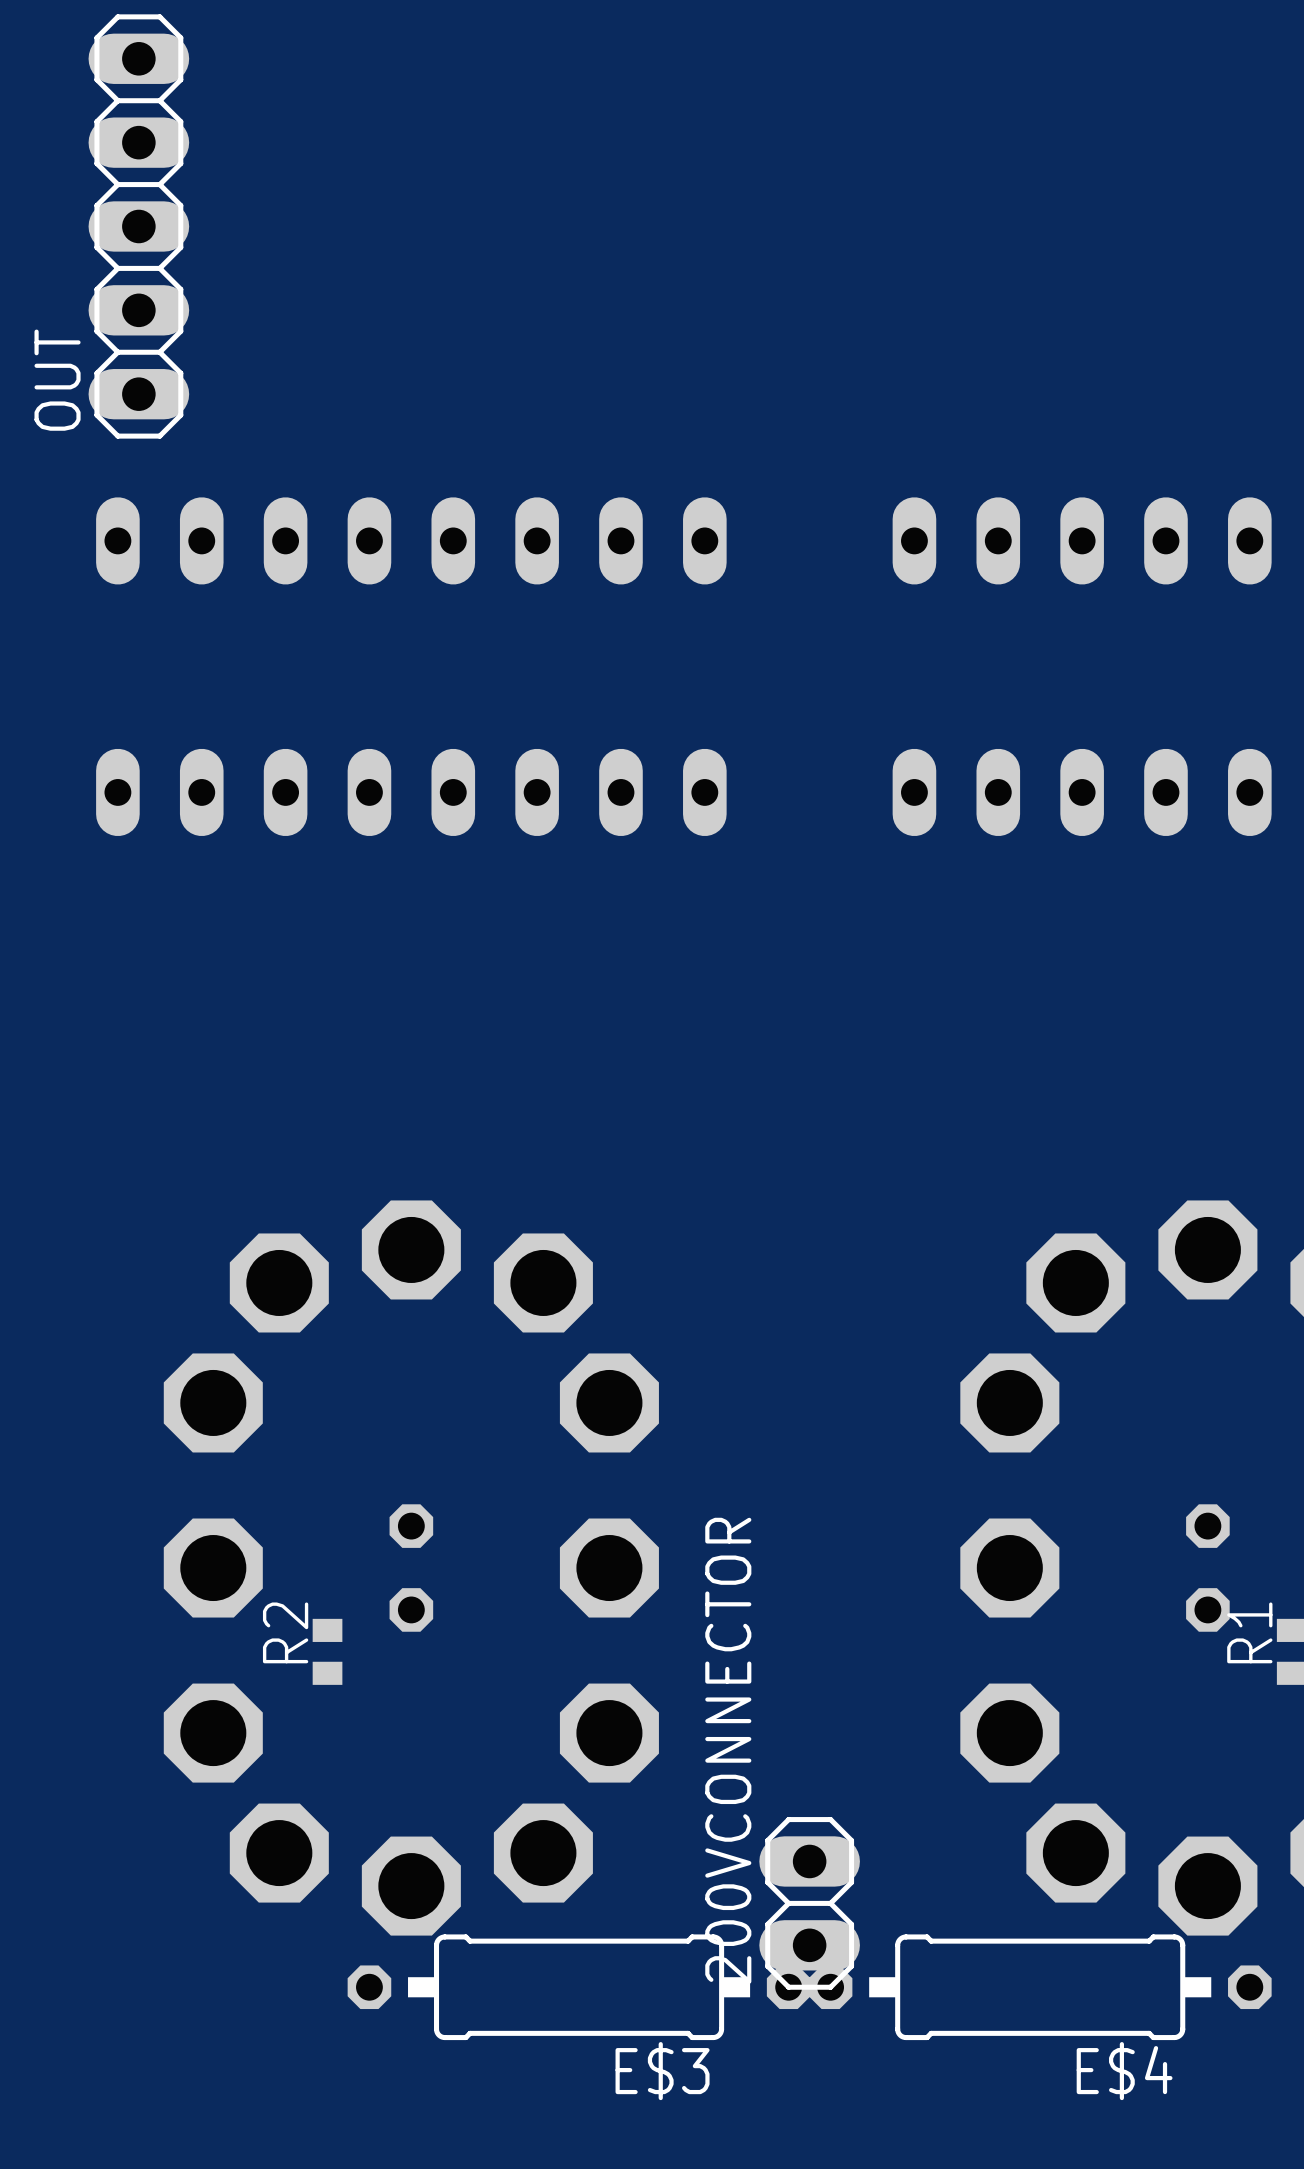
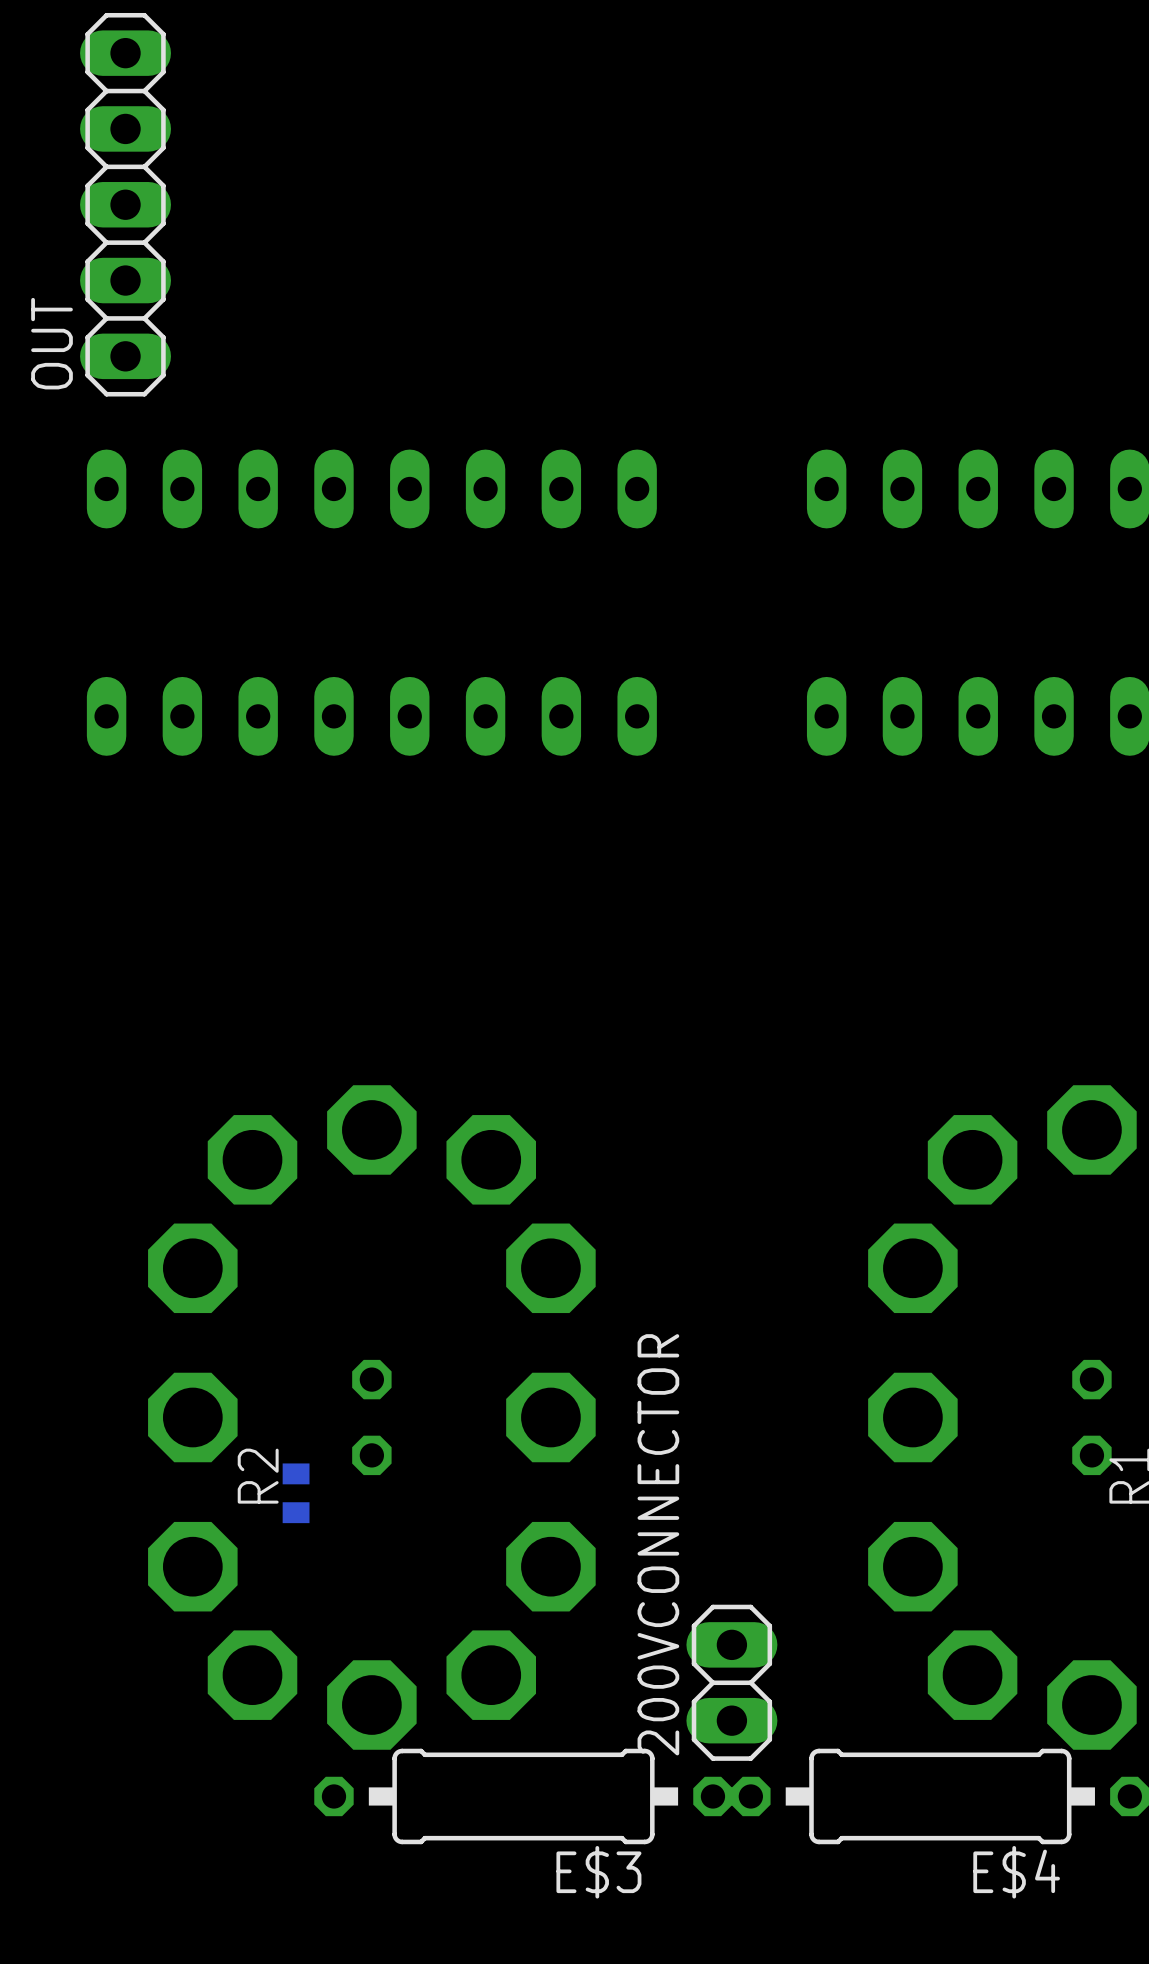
200VCONNECTOR position: (809, 1903) -> (731, 1682)

